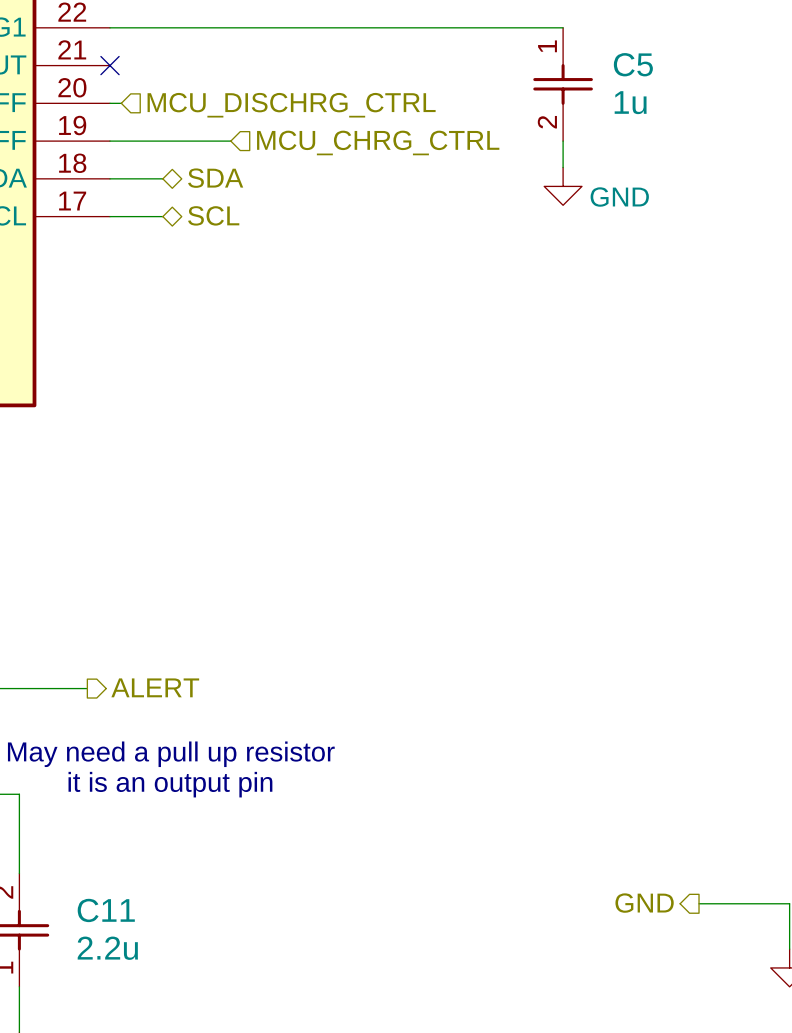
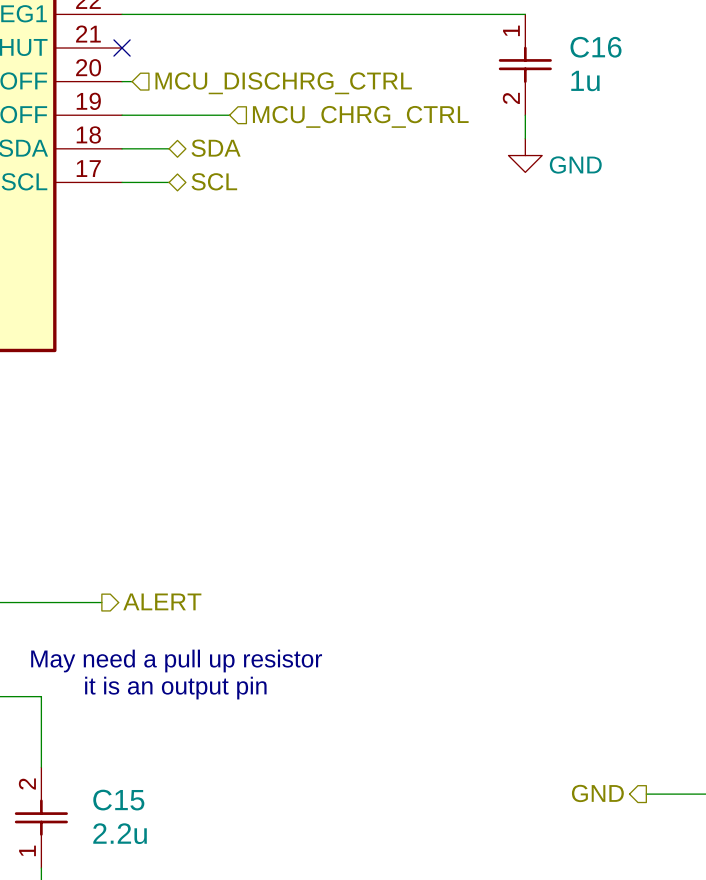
C5 name: C5 (633, 64) -> C16 (596, 47)
C11 name: C11 (106, 910) -> C15 (118, 800)

